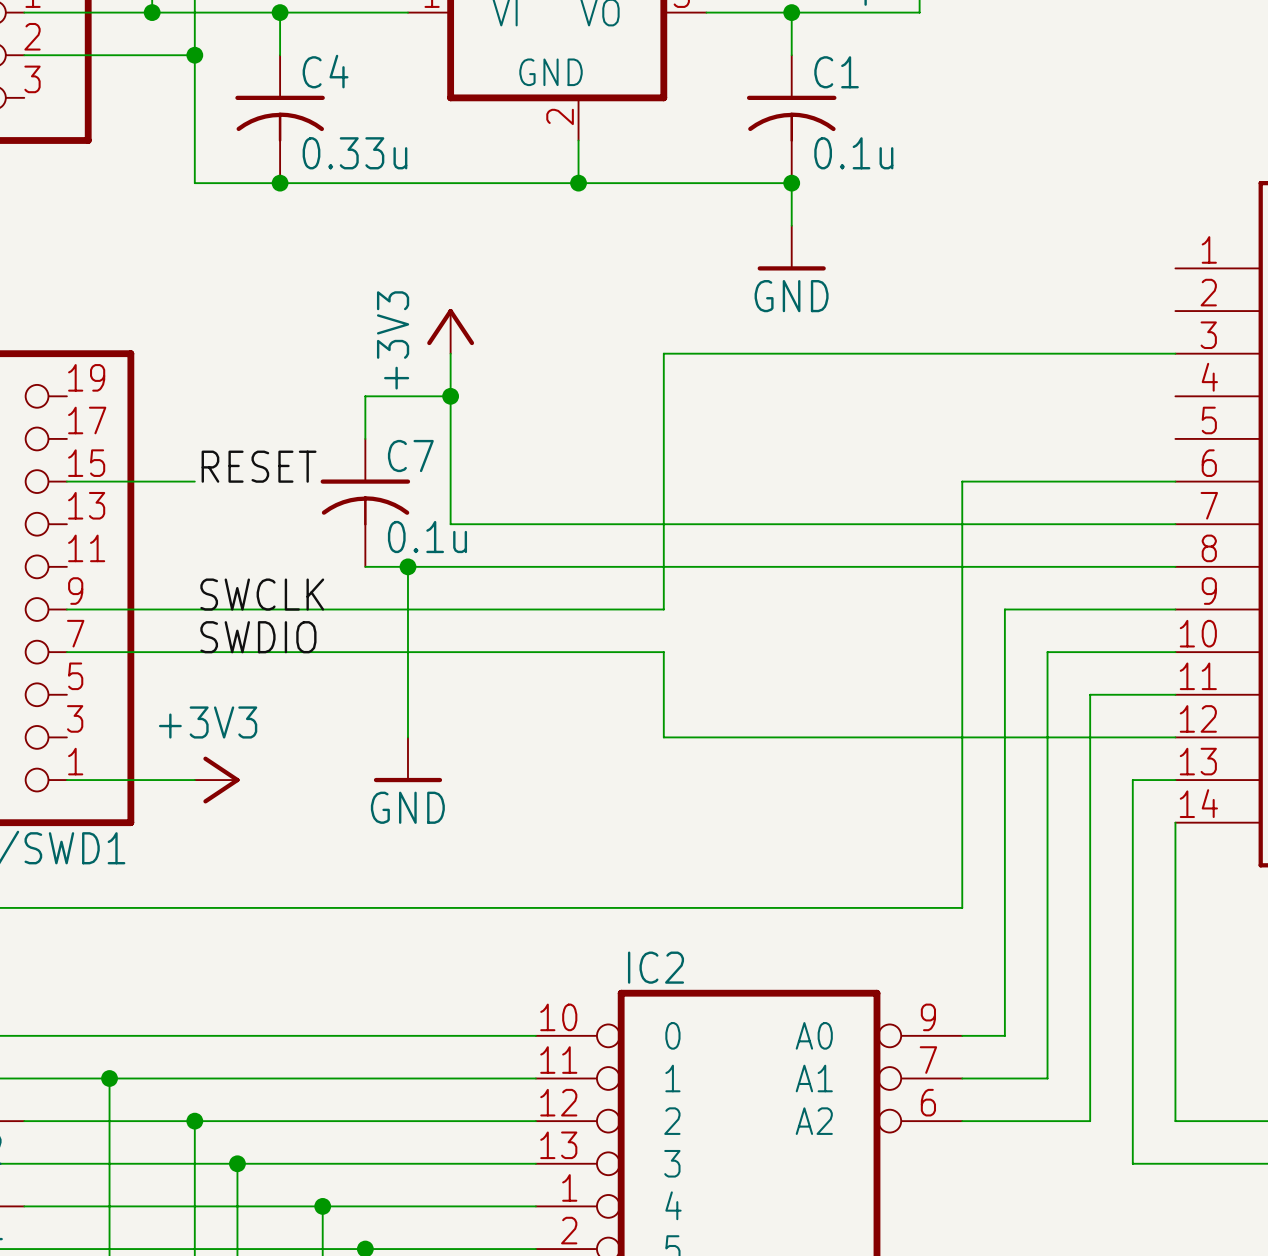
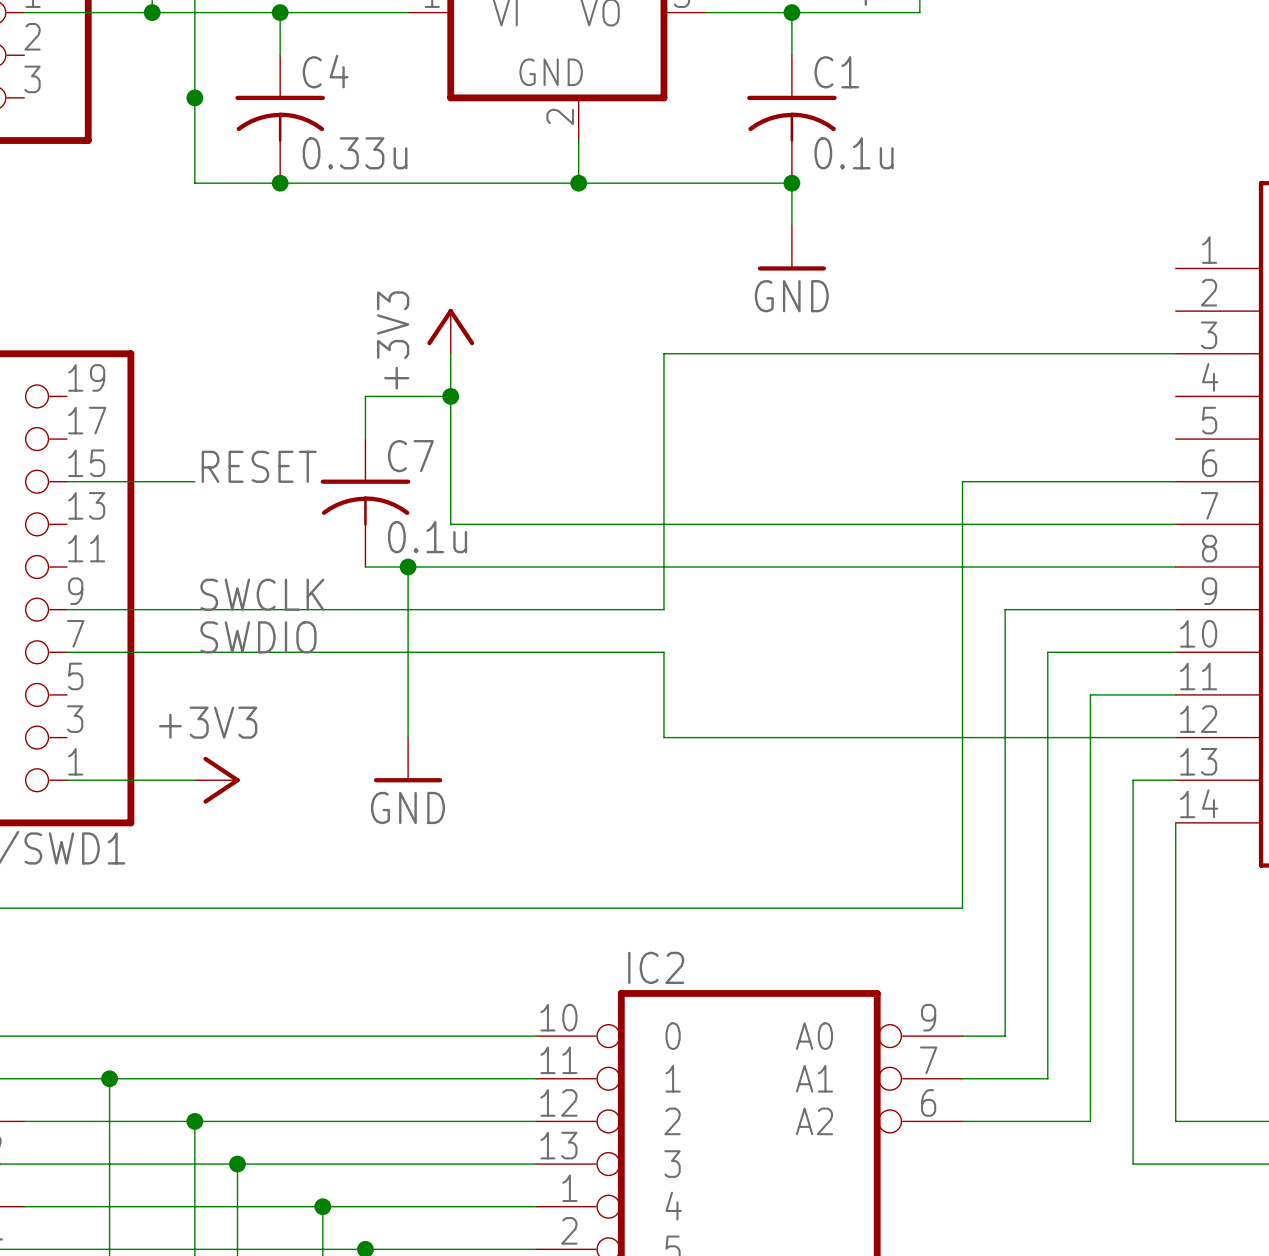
wire: (24, 55) (194, 55) -> none
junction position: (194, 55) -> (194, 97)

